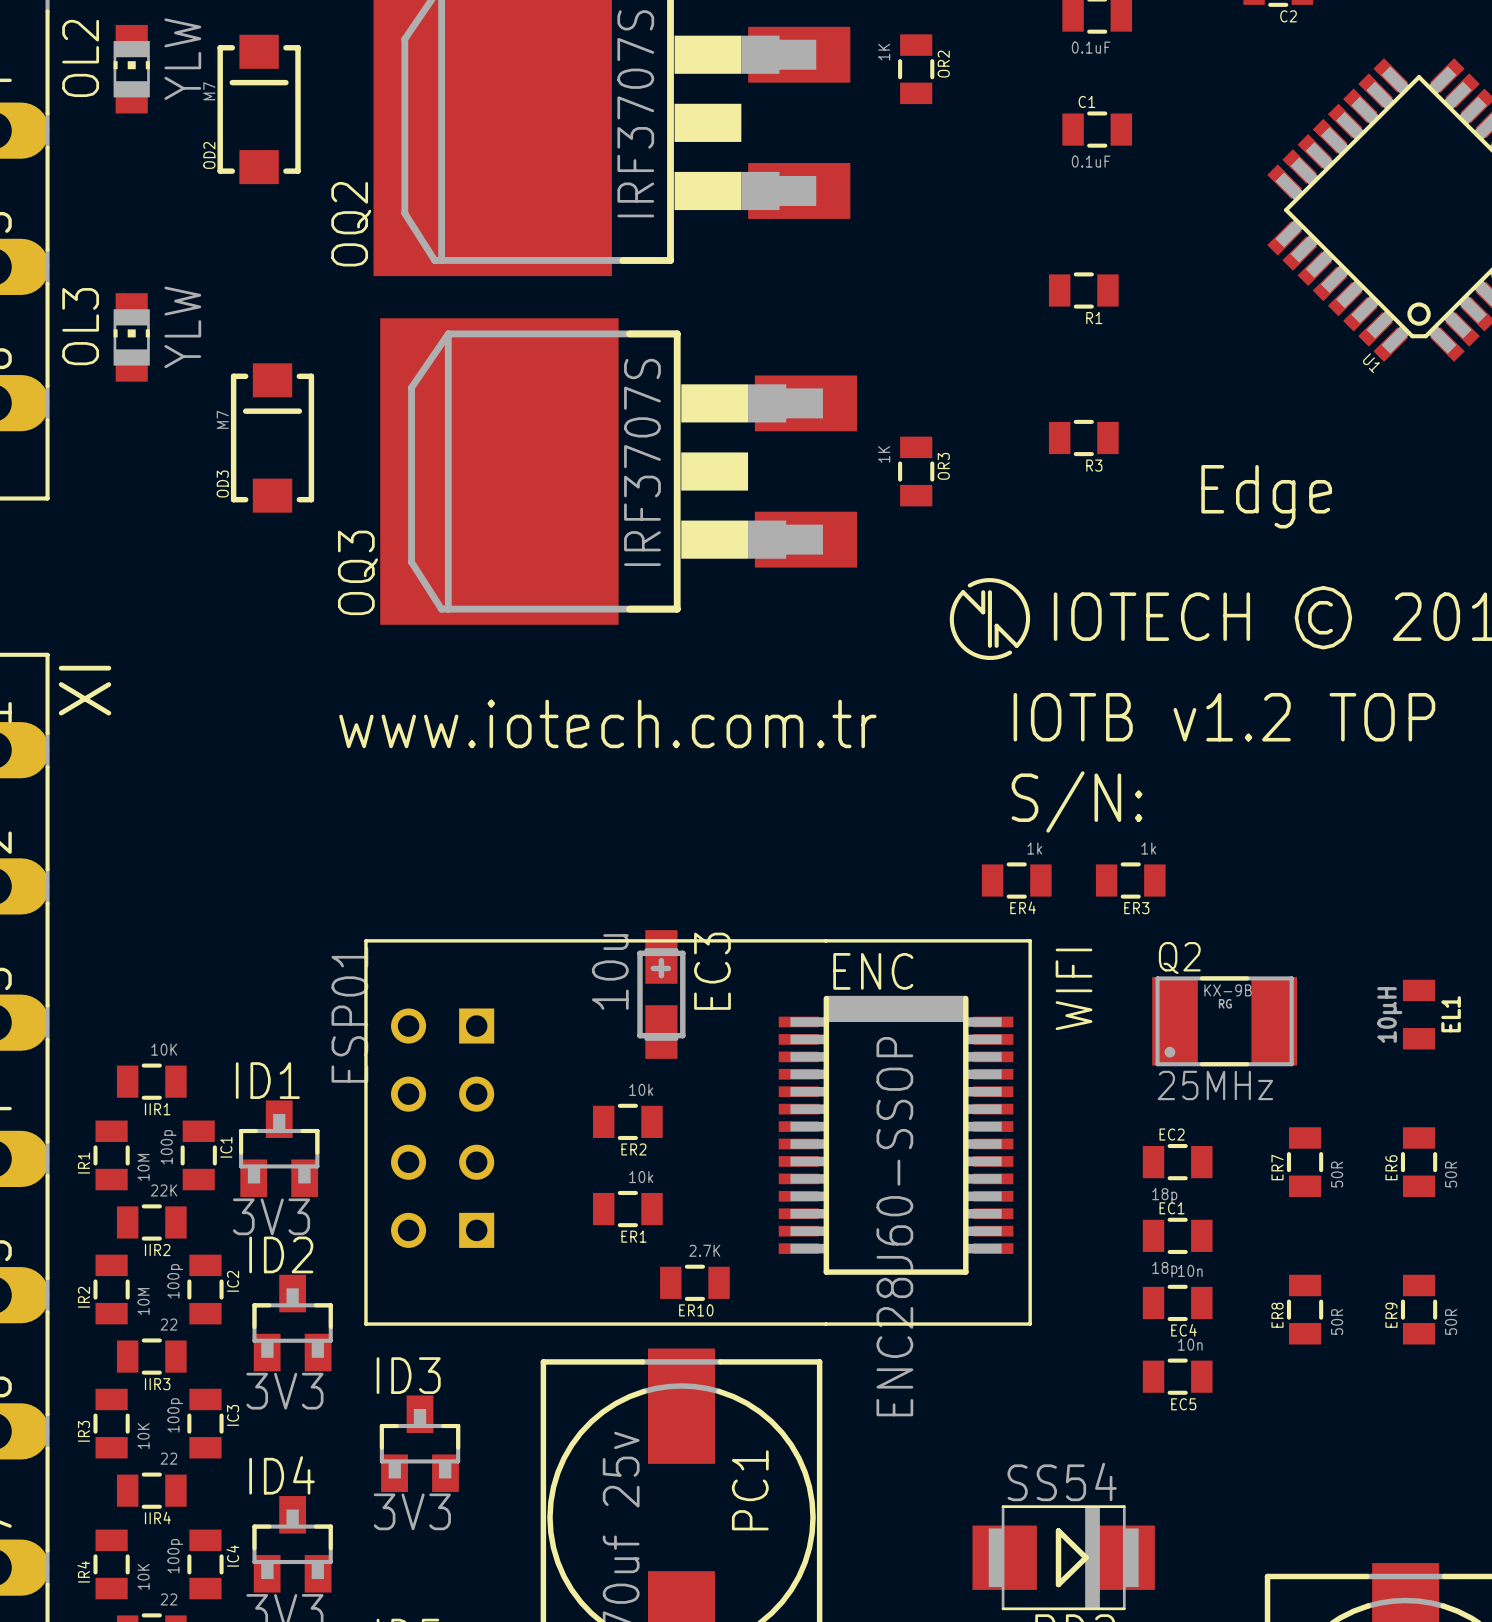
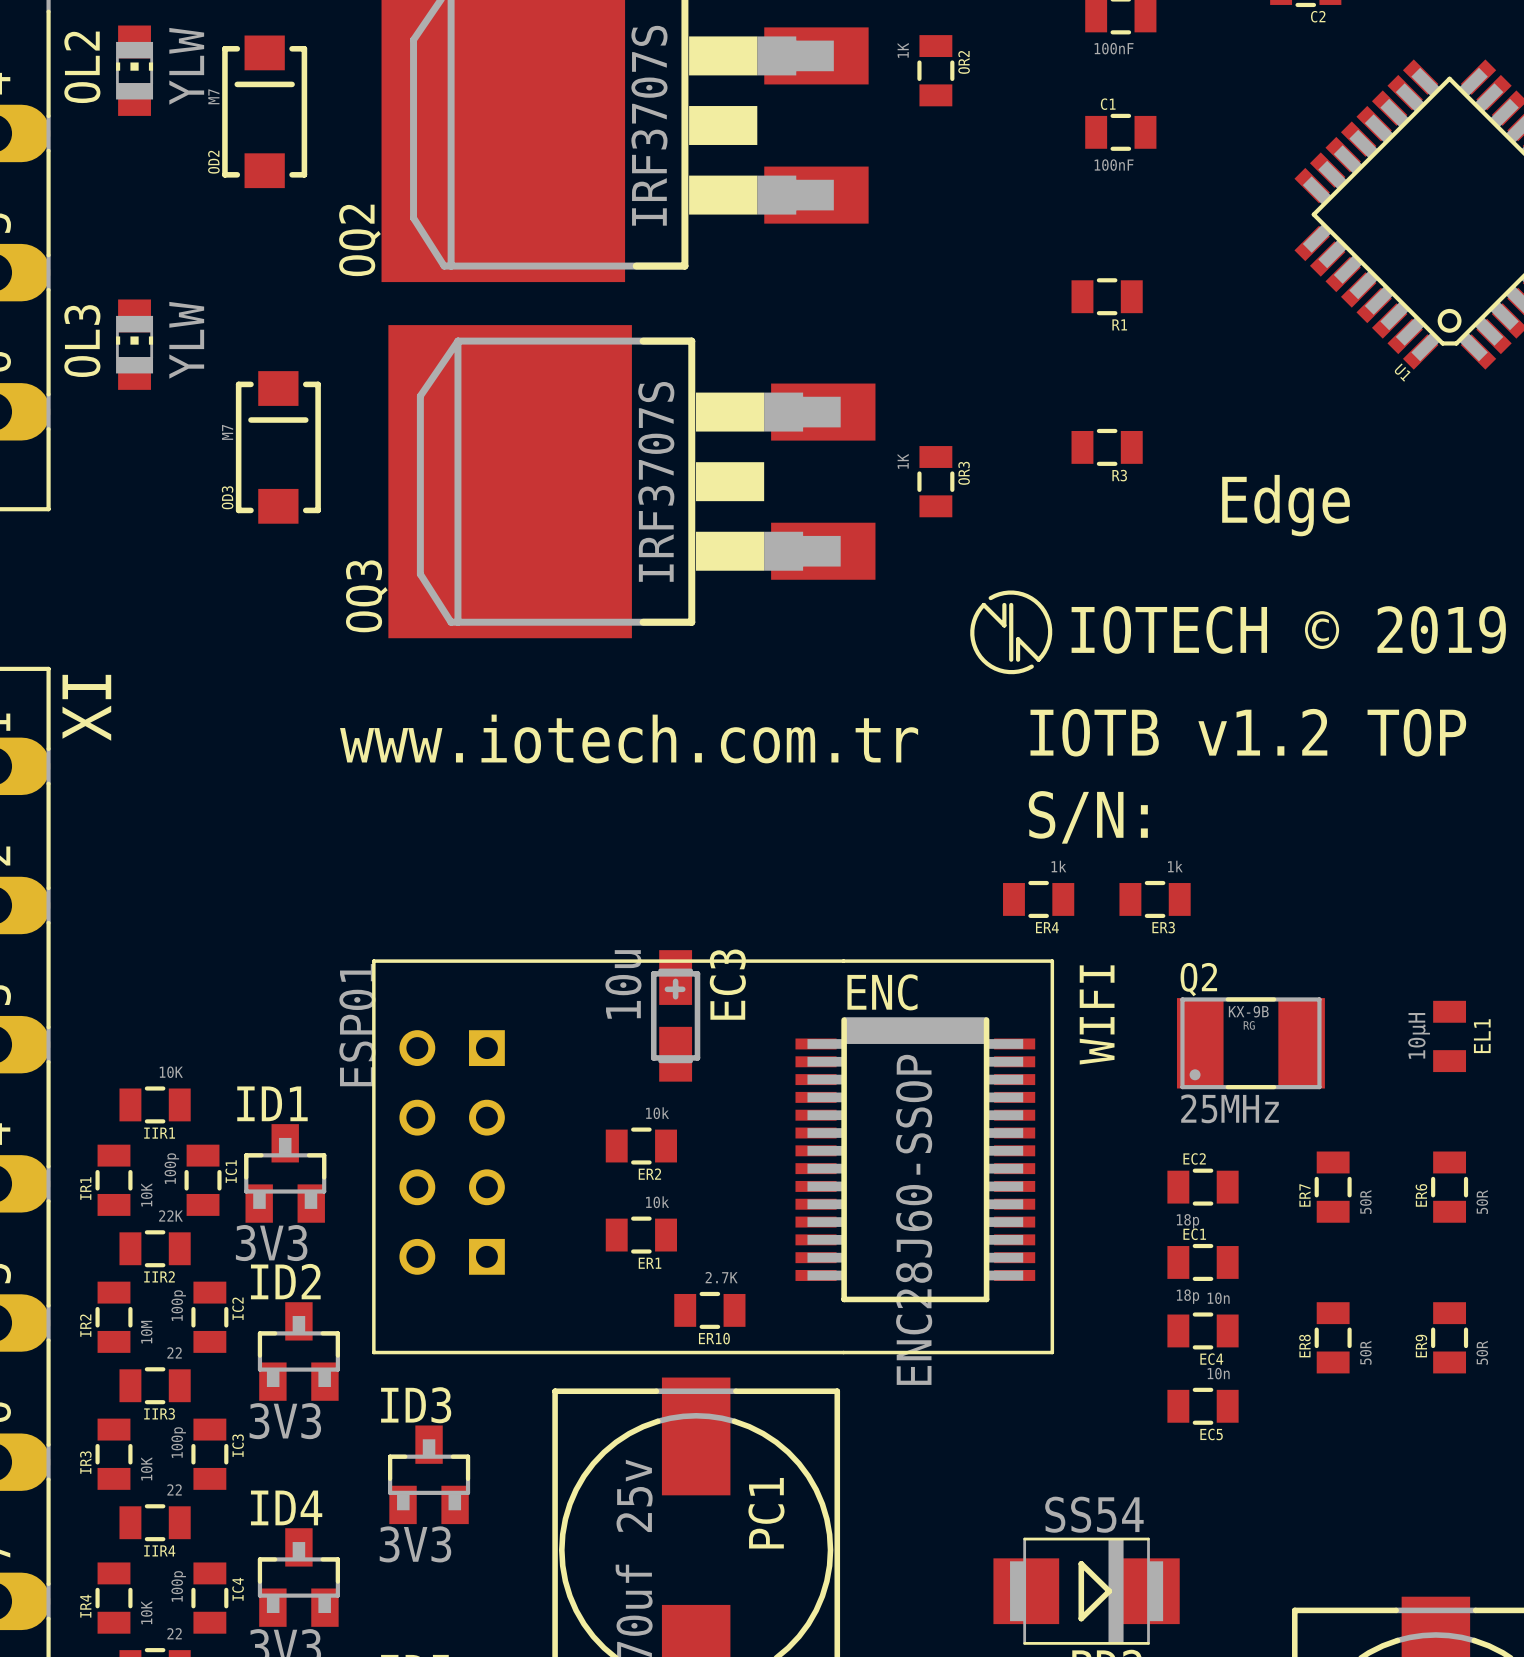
part value: 0.1uF (1091, 47) -> 100nF (1114, 48)
C1 value: 0.1uF (1091, 161) -> 100nF (1114, 165)
IR1 value: 10M (143, 1167) -> 10K (146, 1194)

